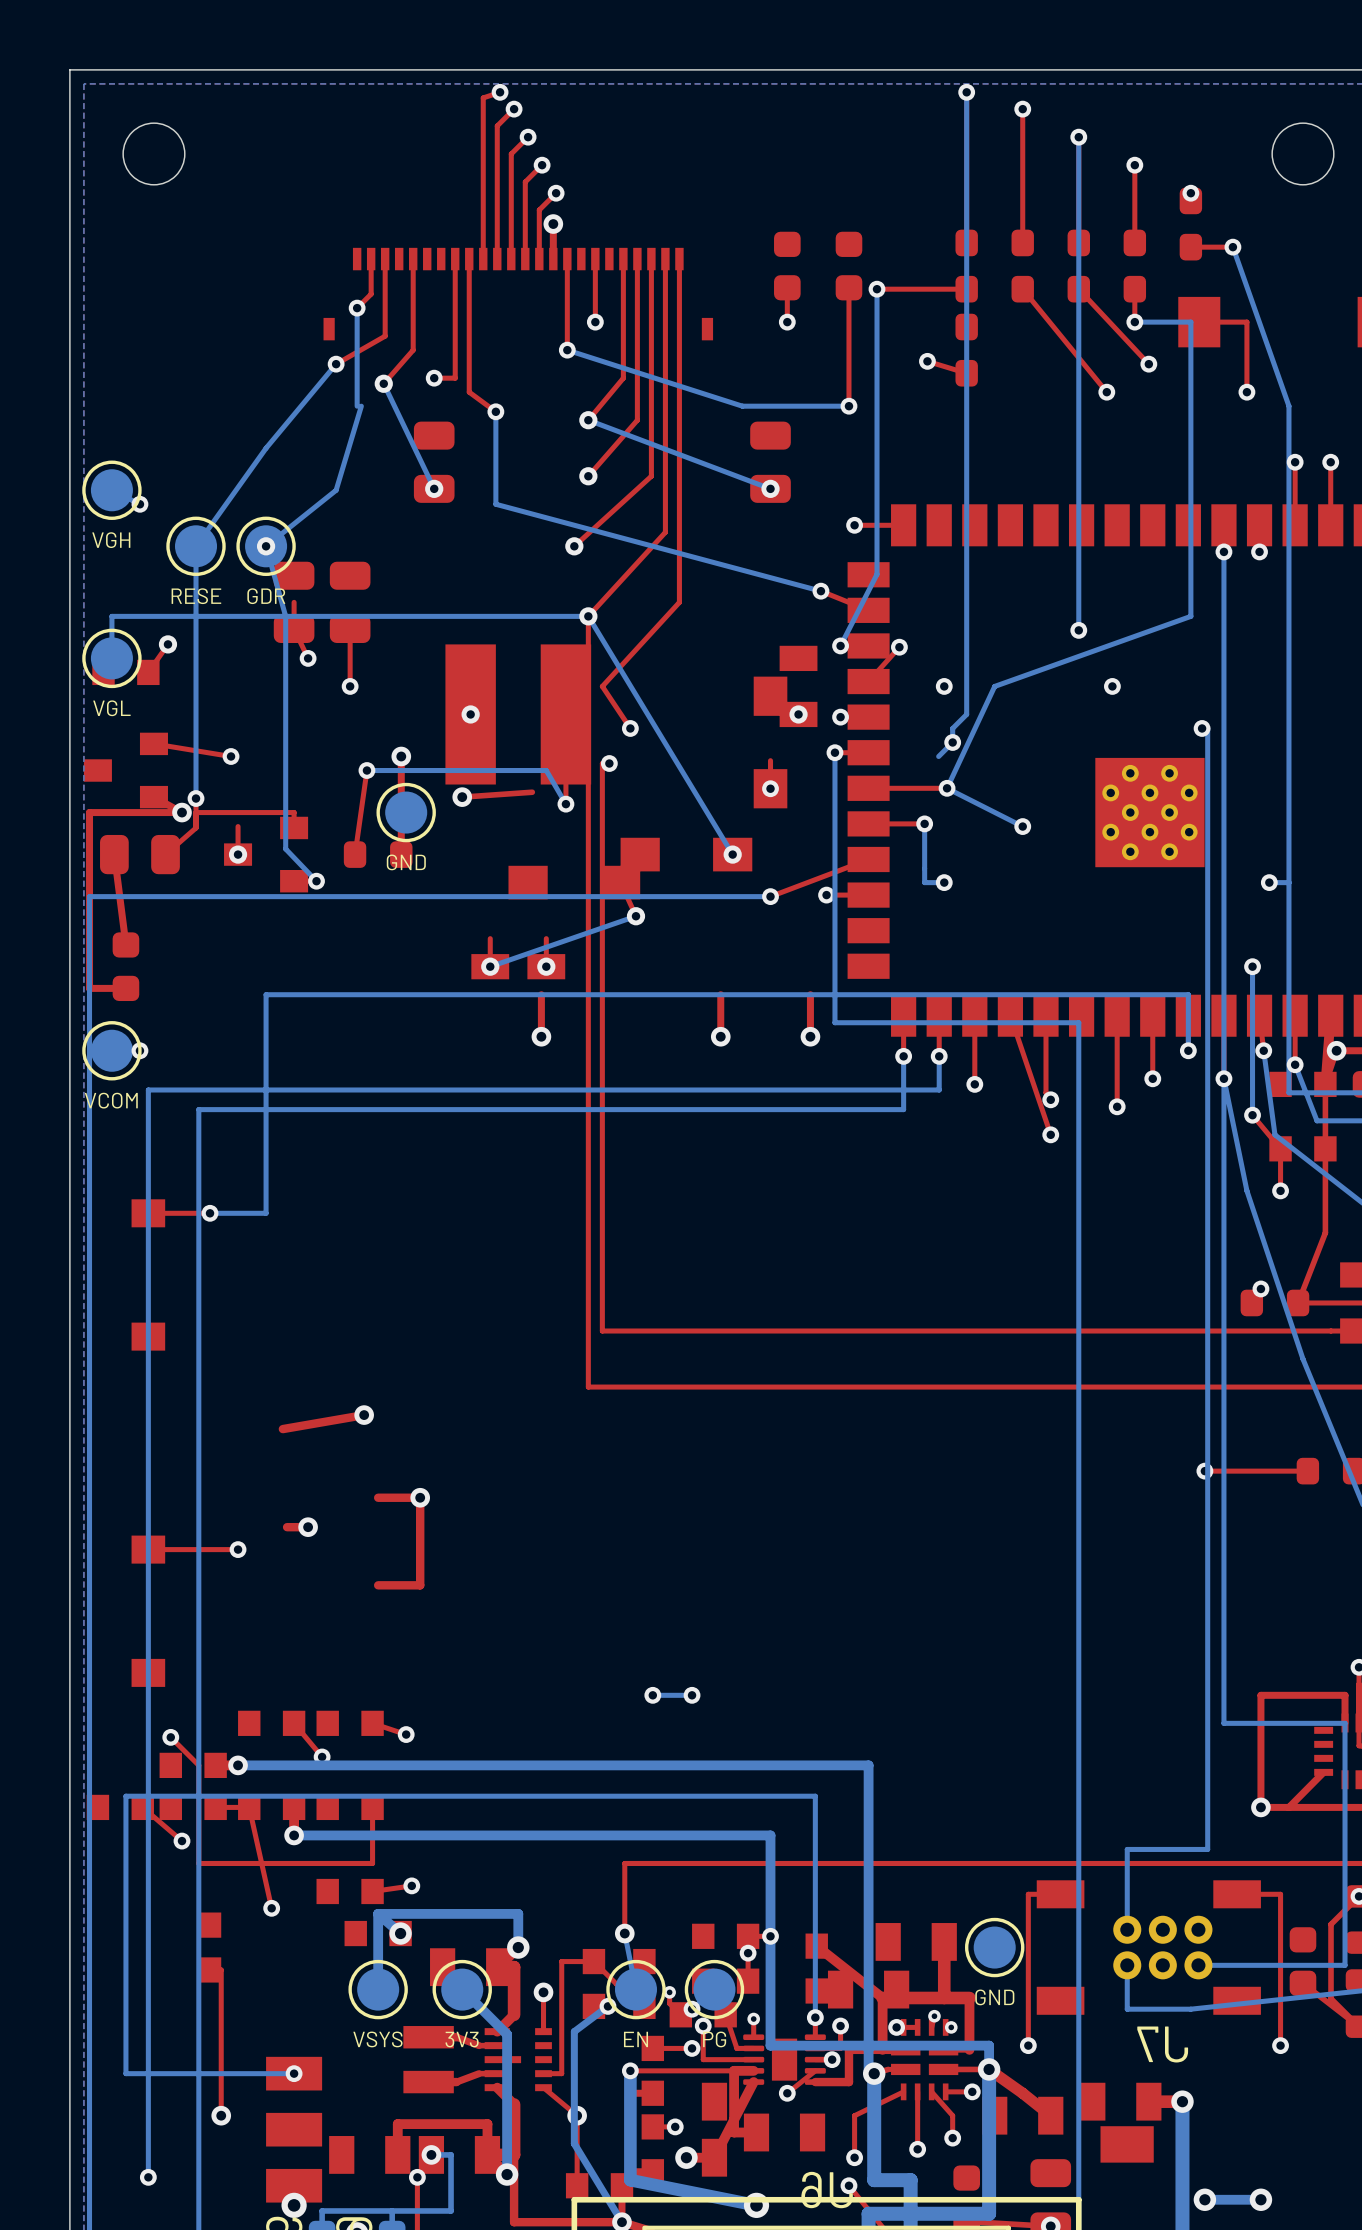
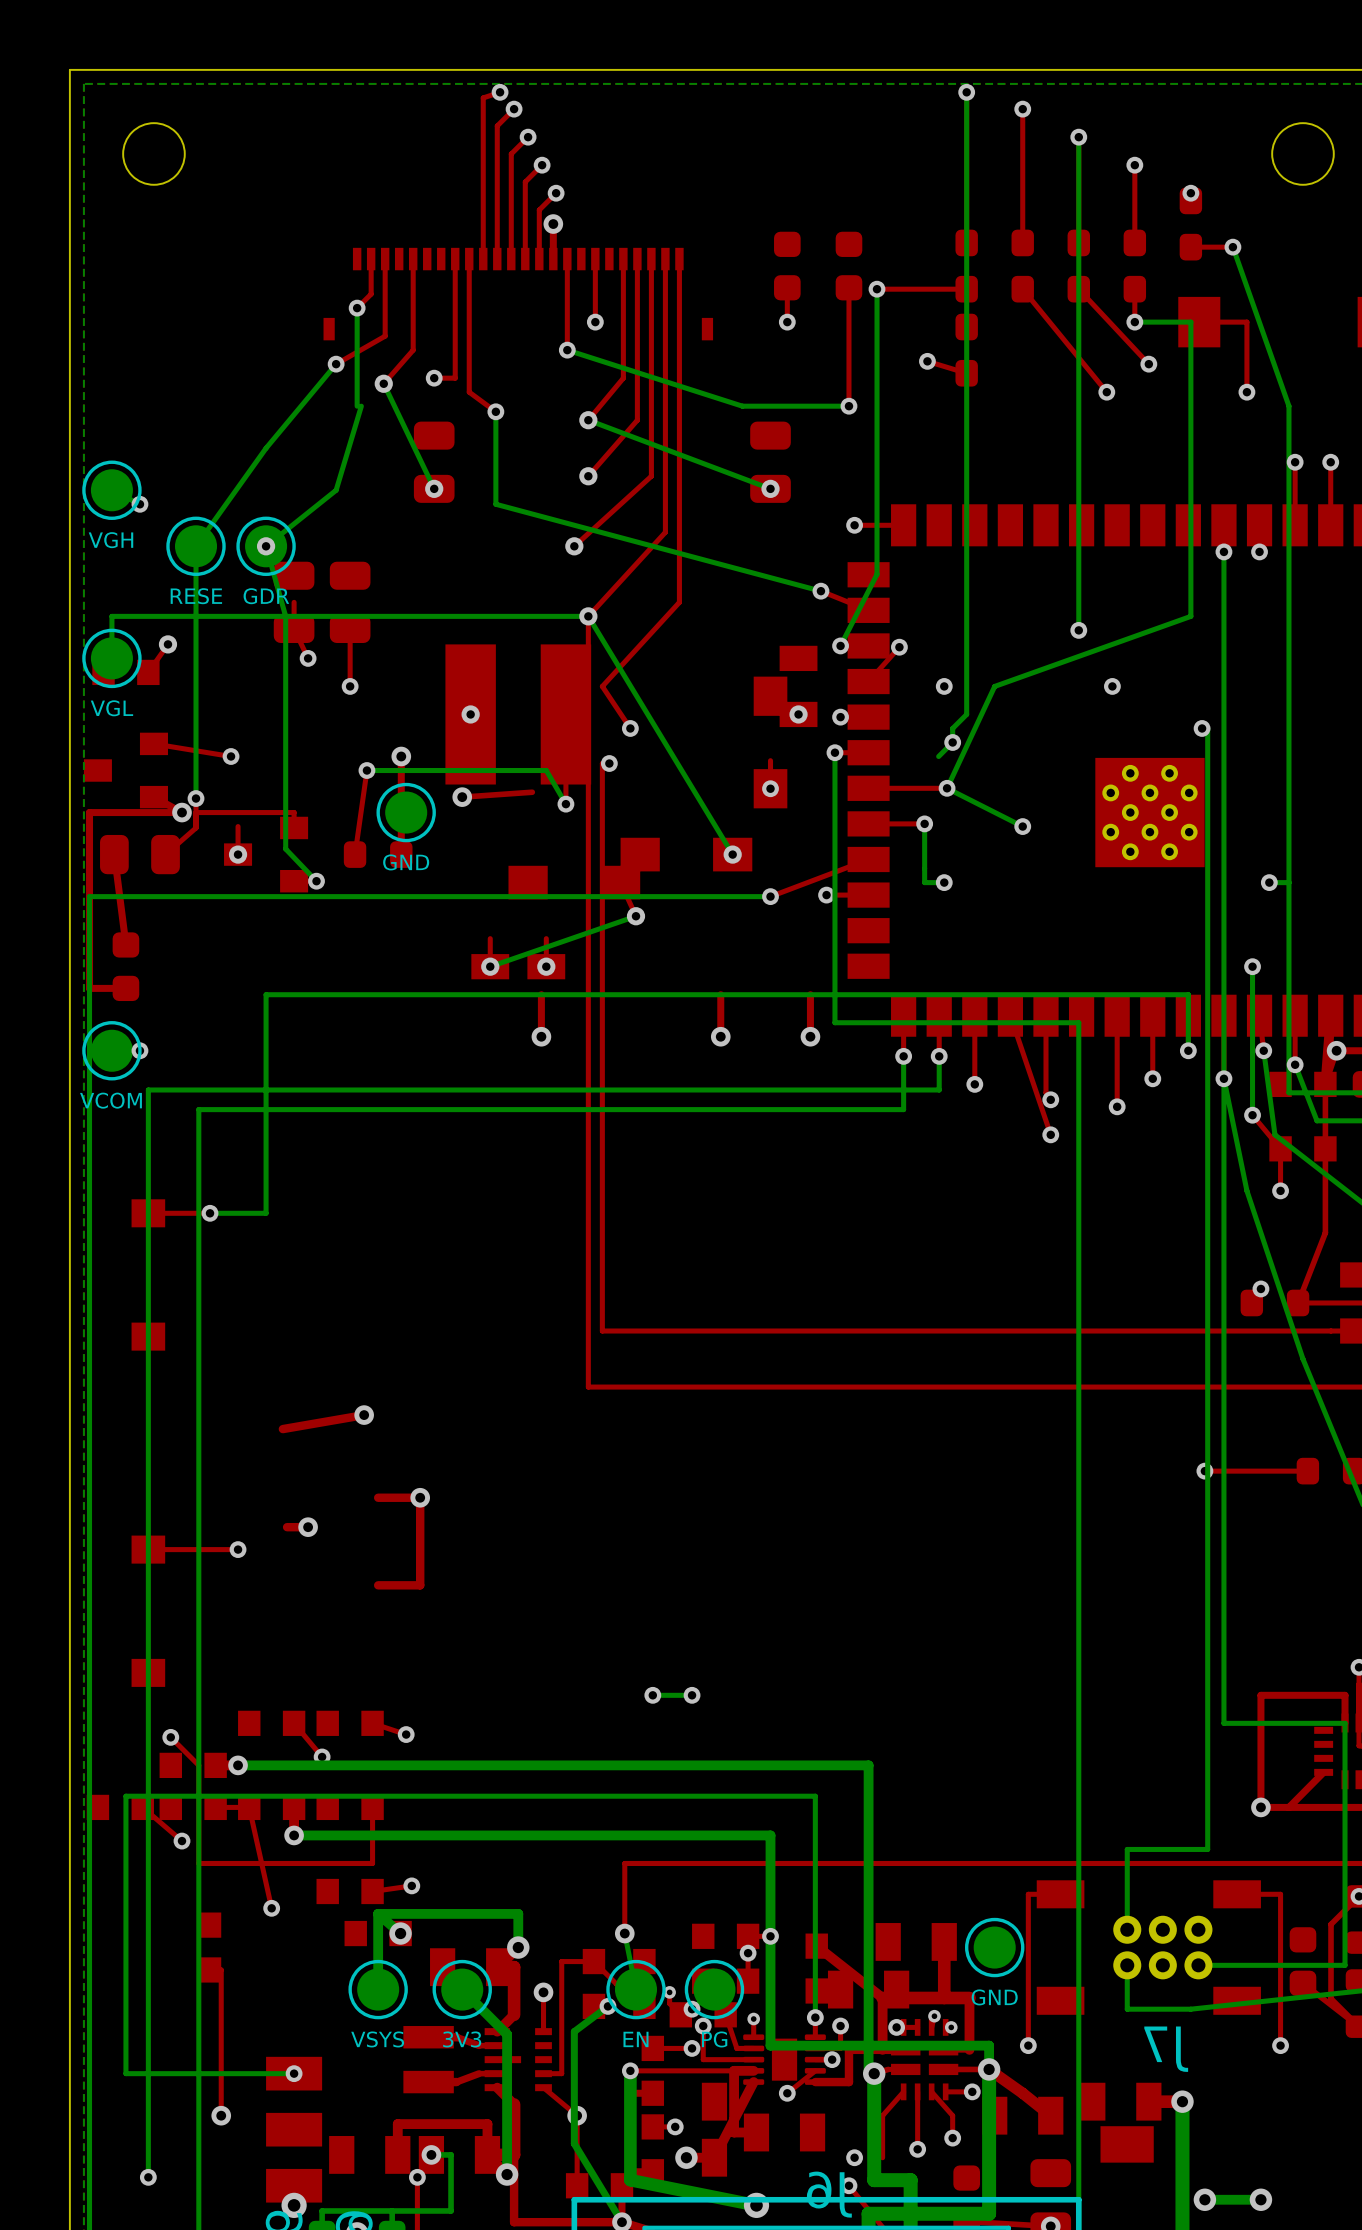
top track: (903, 2091) (854, 2115) (854, 2157) -> (903, 2091) (882, 2115) (882, 2157)

